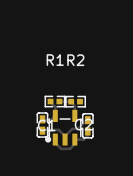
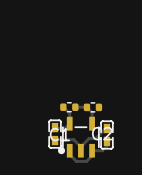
R1: (54, 101) -> none
part: none -> (69, 107)
R2: (75, 101) -> none
part: none -> (92, 107)

